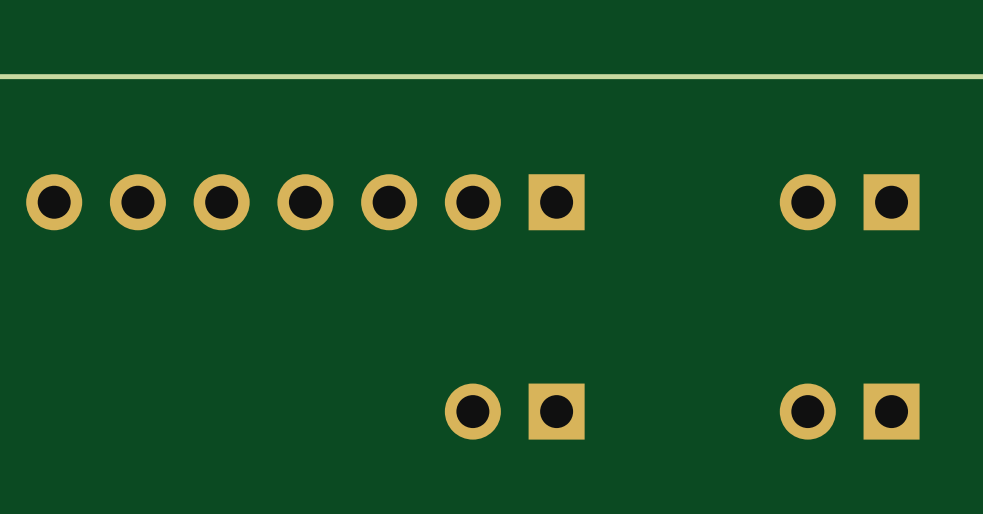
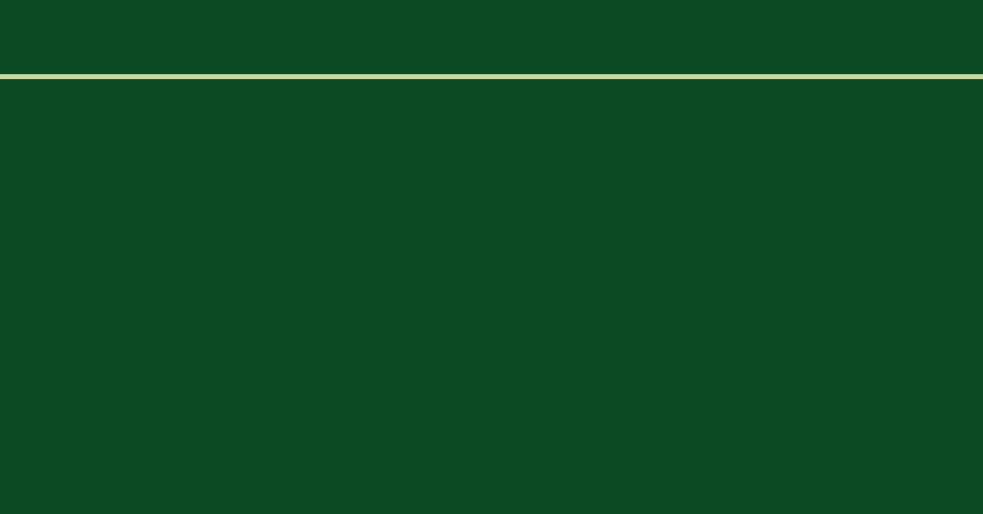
part: (305, 202) -> none
part: (849, 202) -> none
part: (514, 411) -> none
part: (849, 411) -> none

